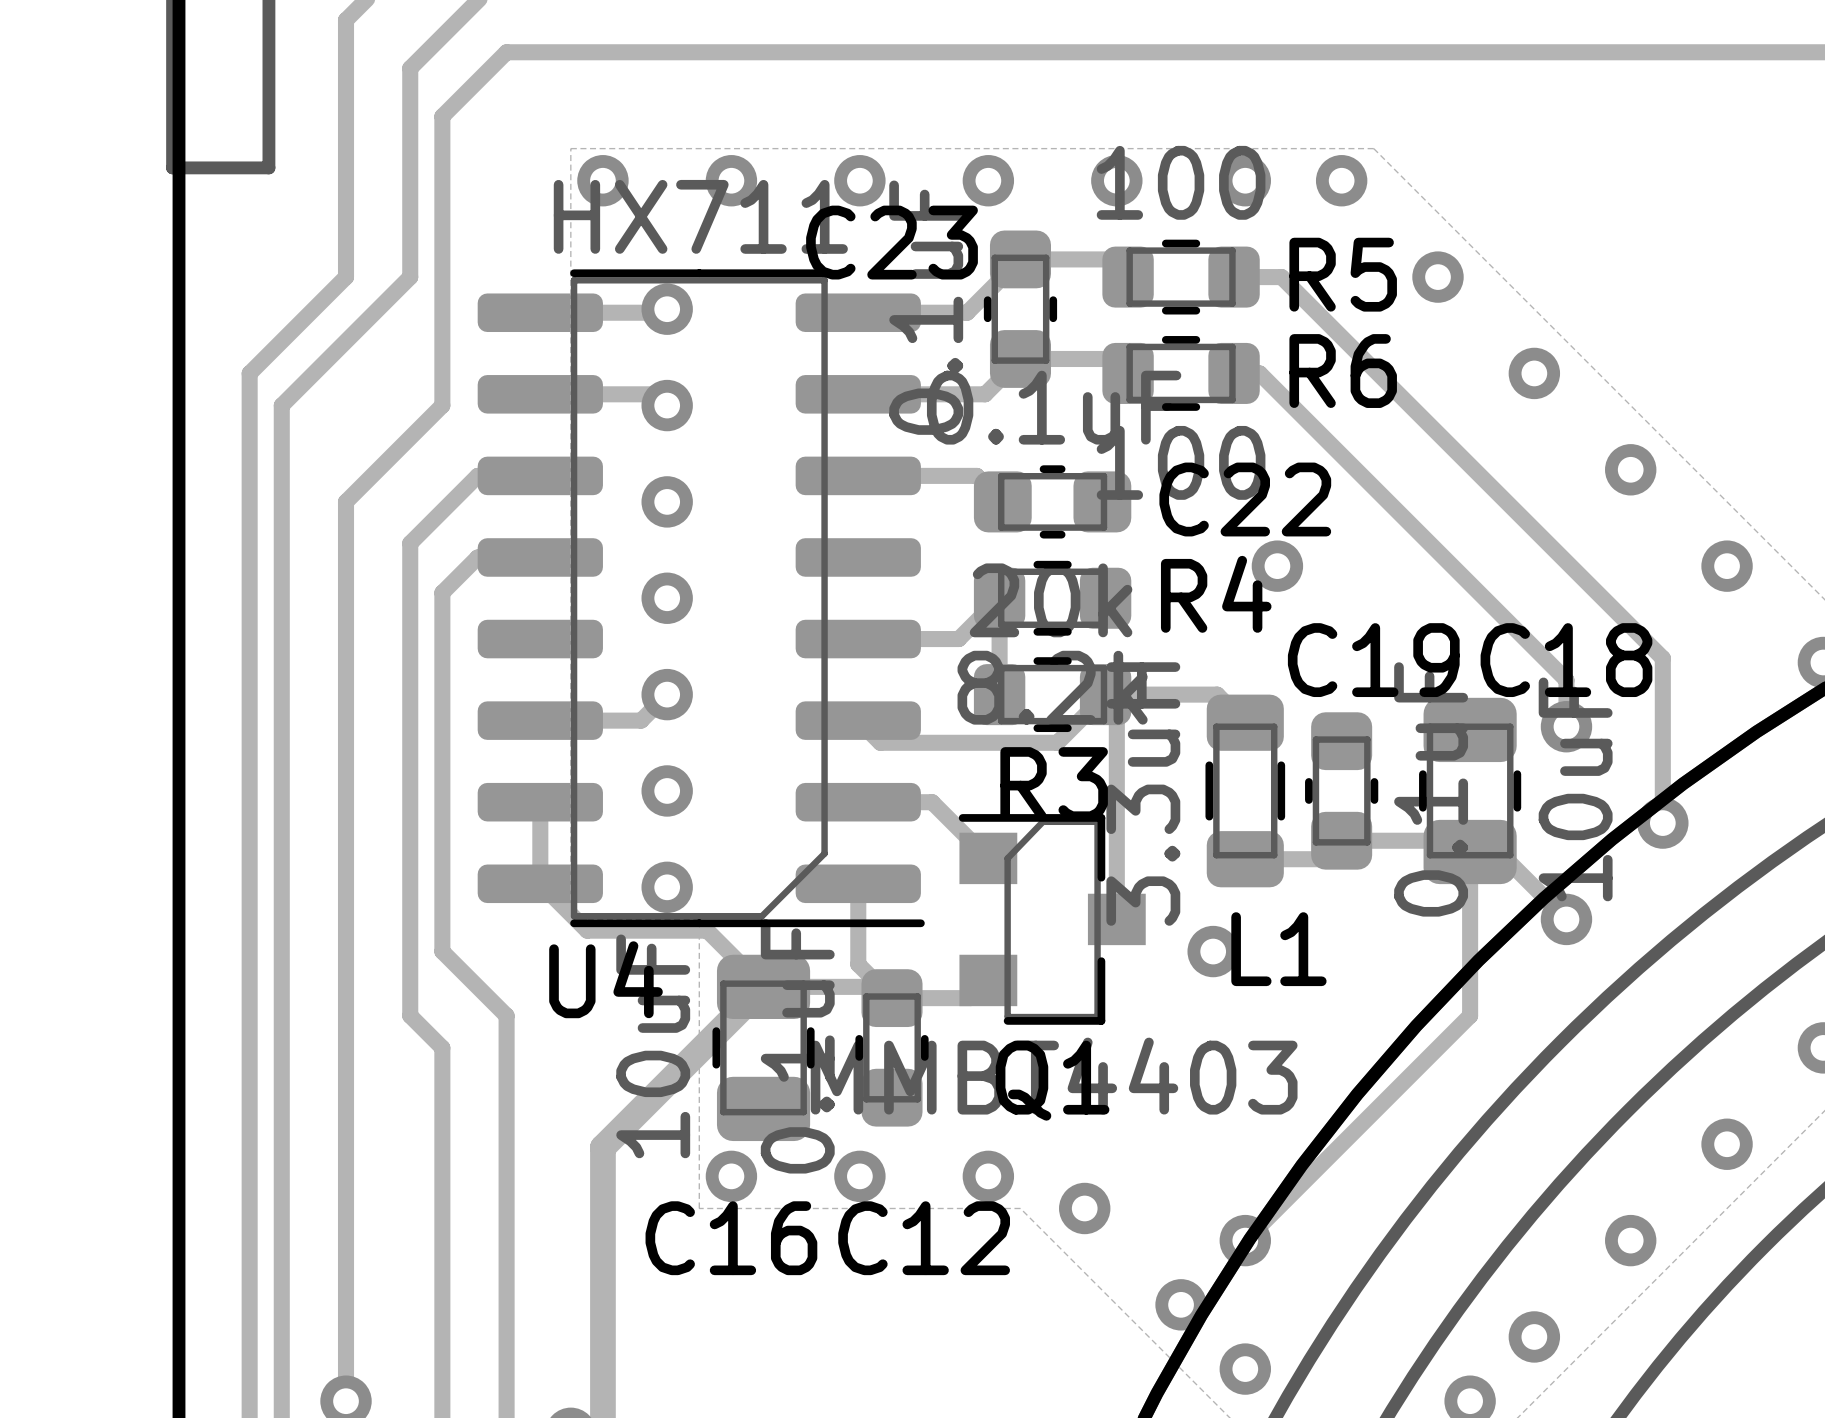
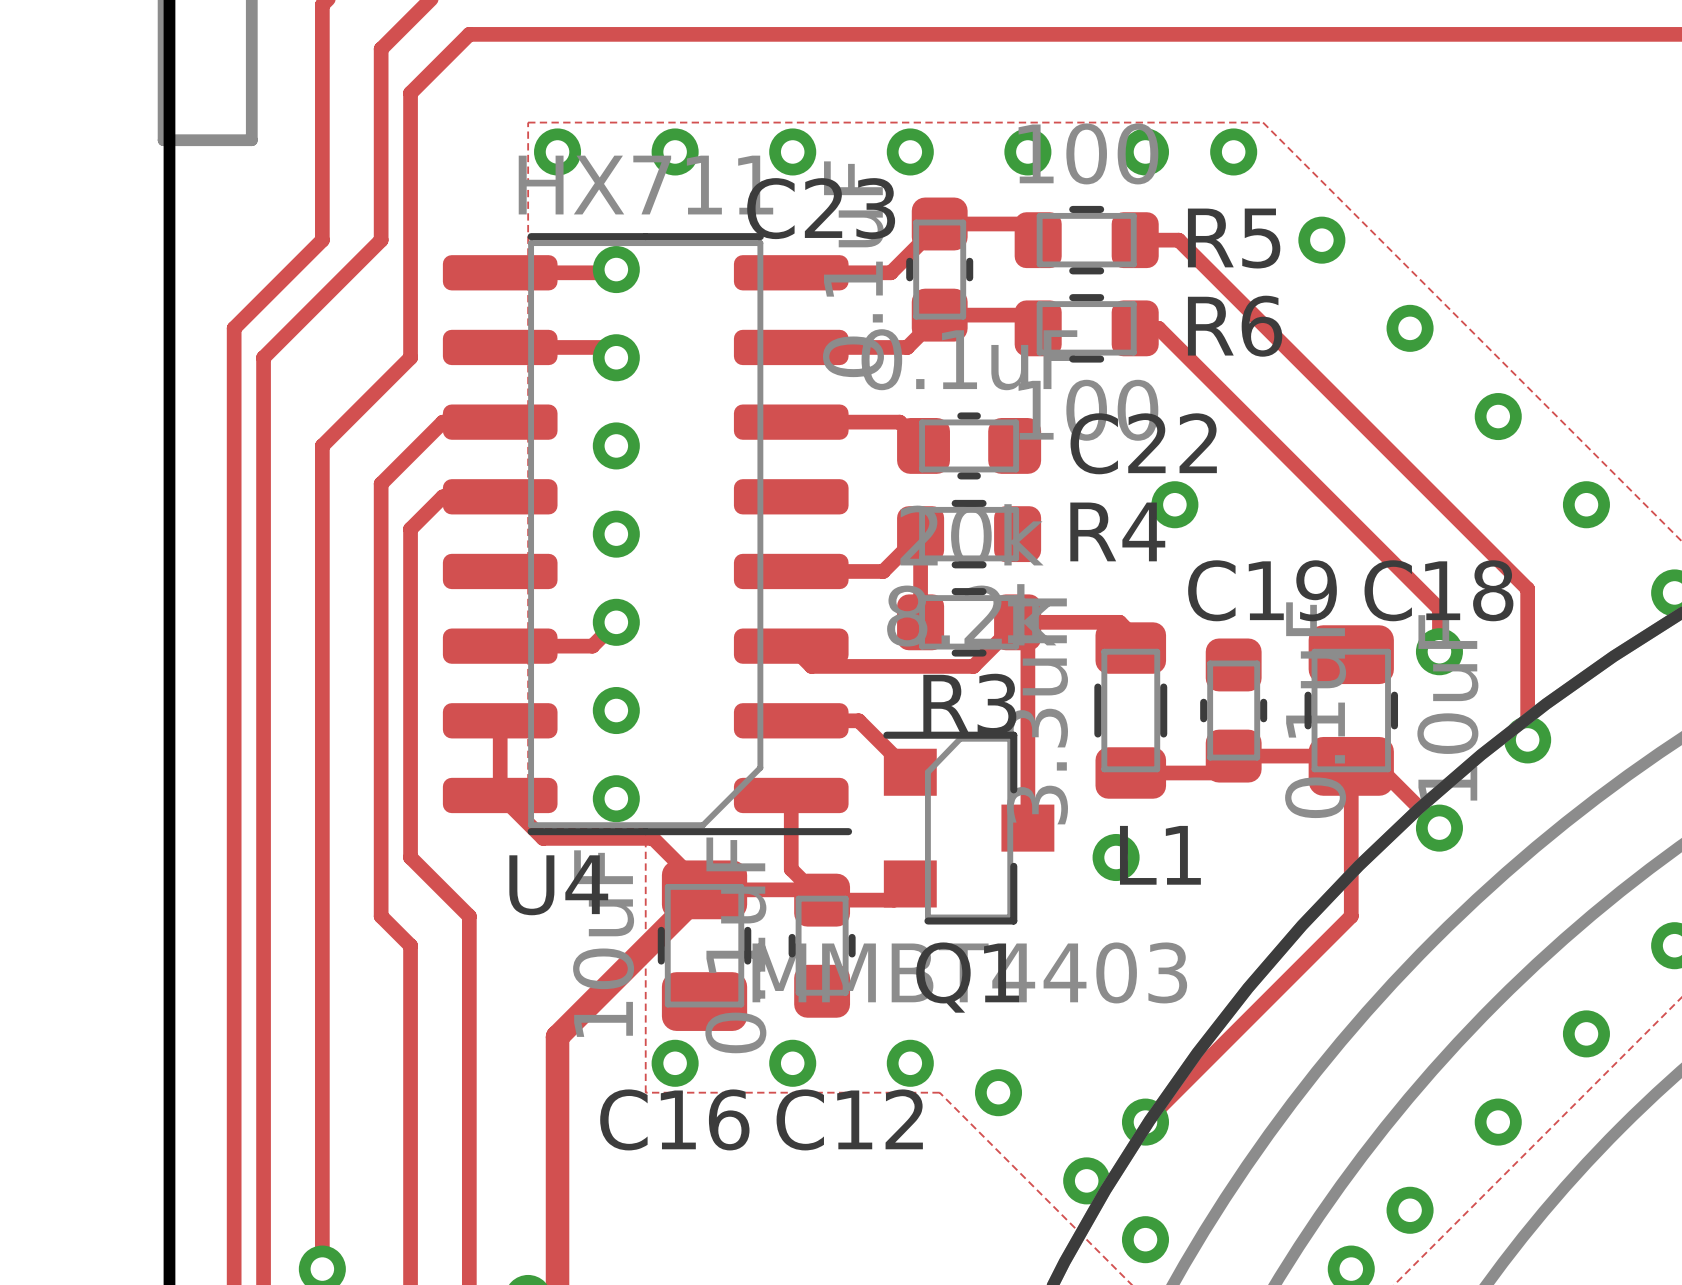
L1 position: (1245, 790) -> (1130, 710)

